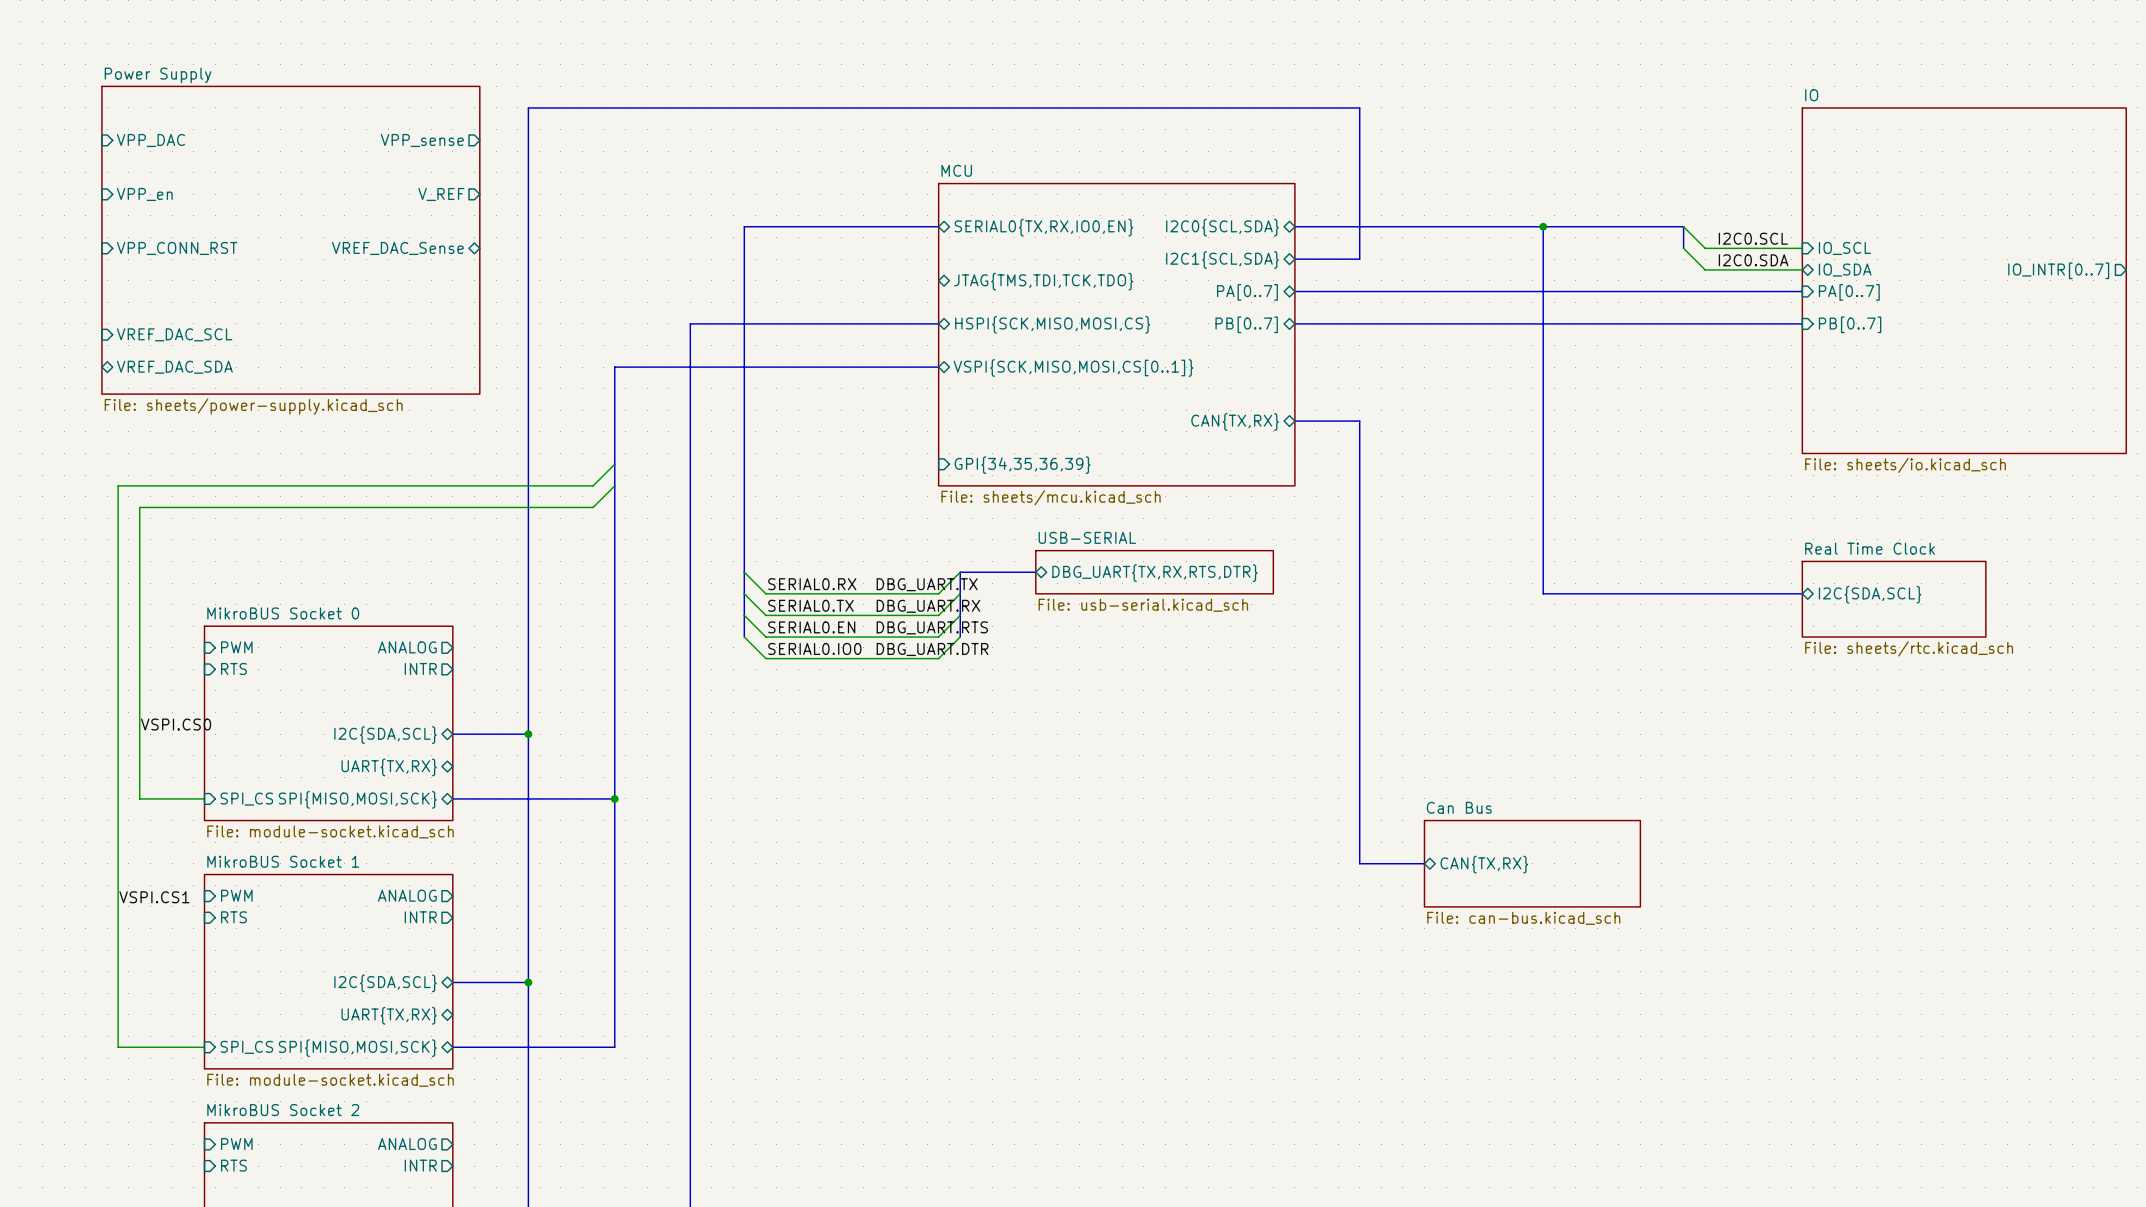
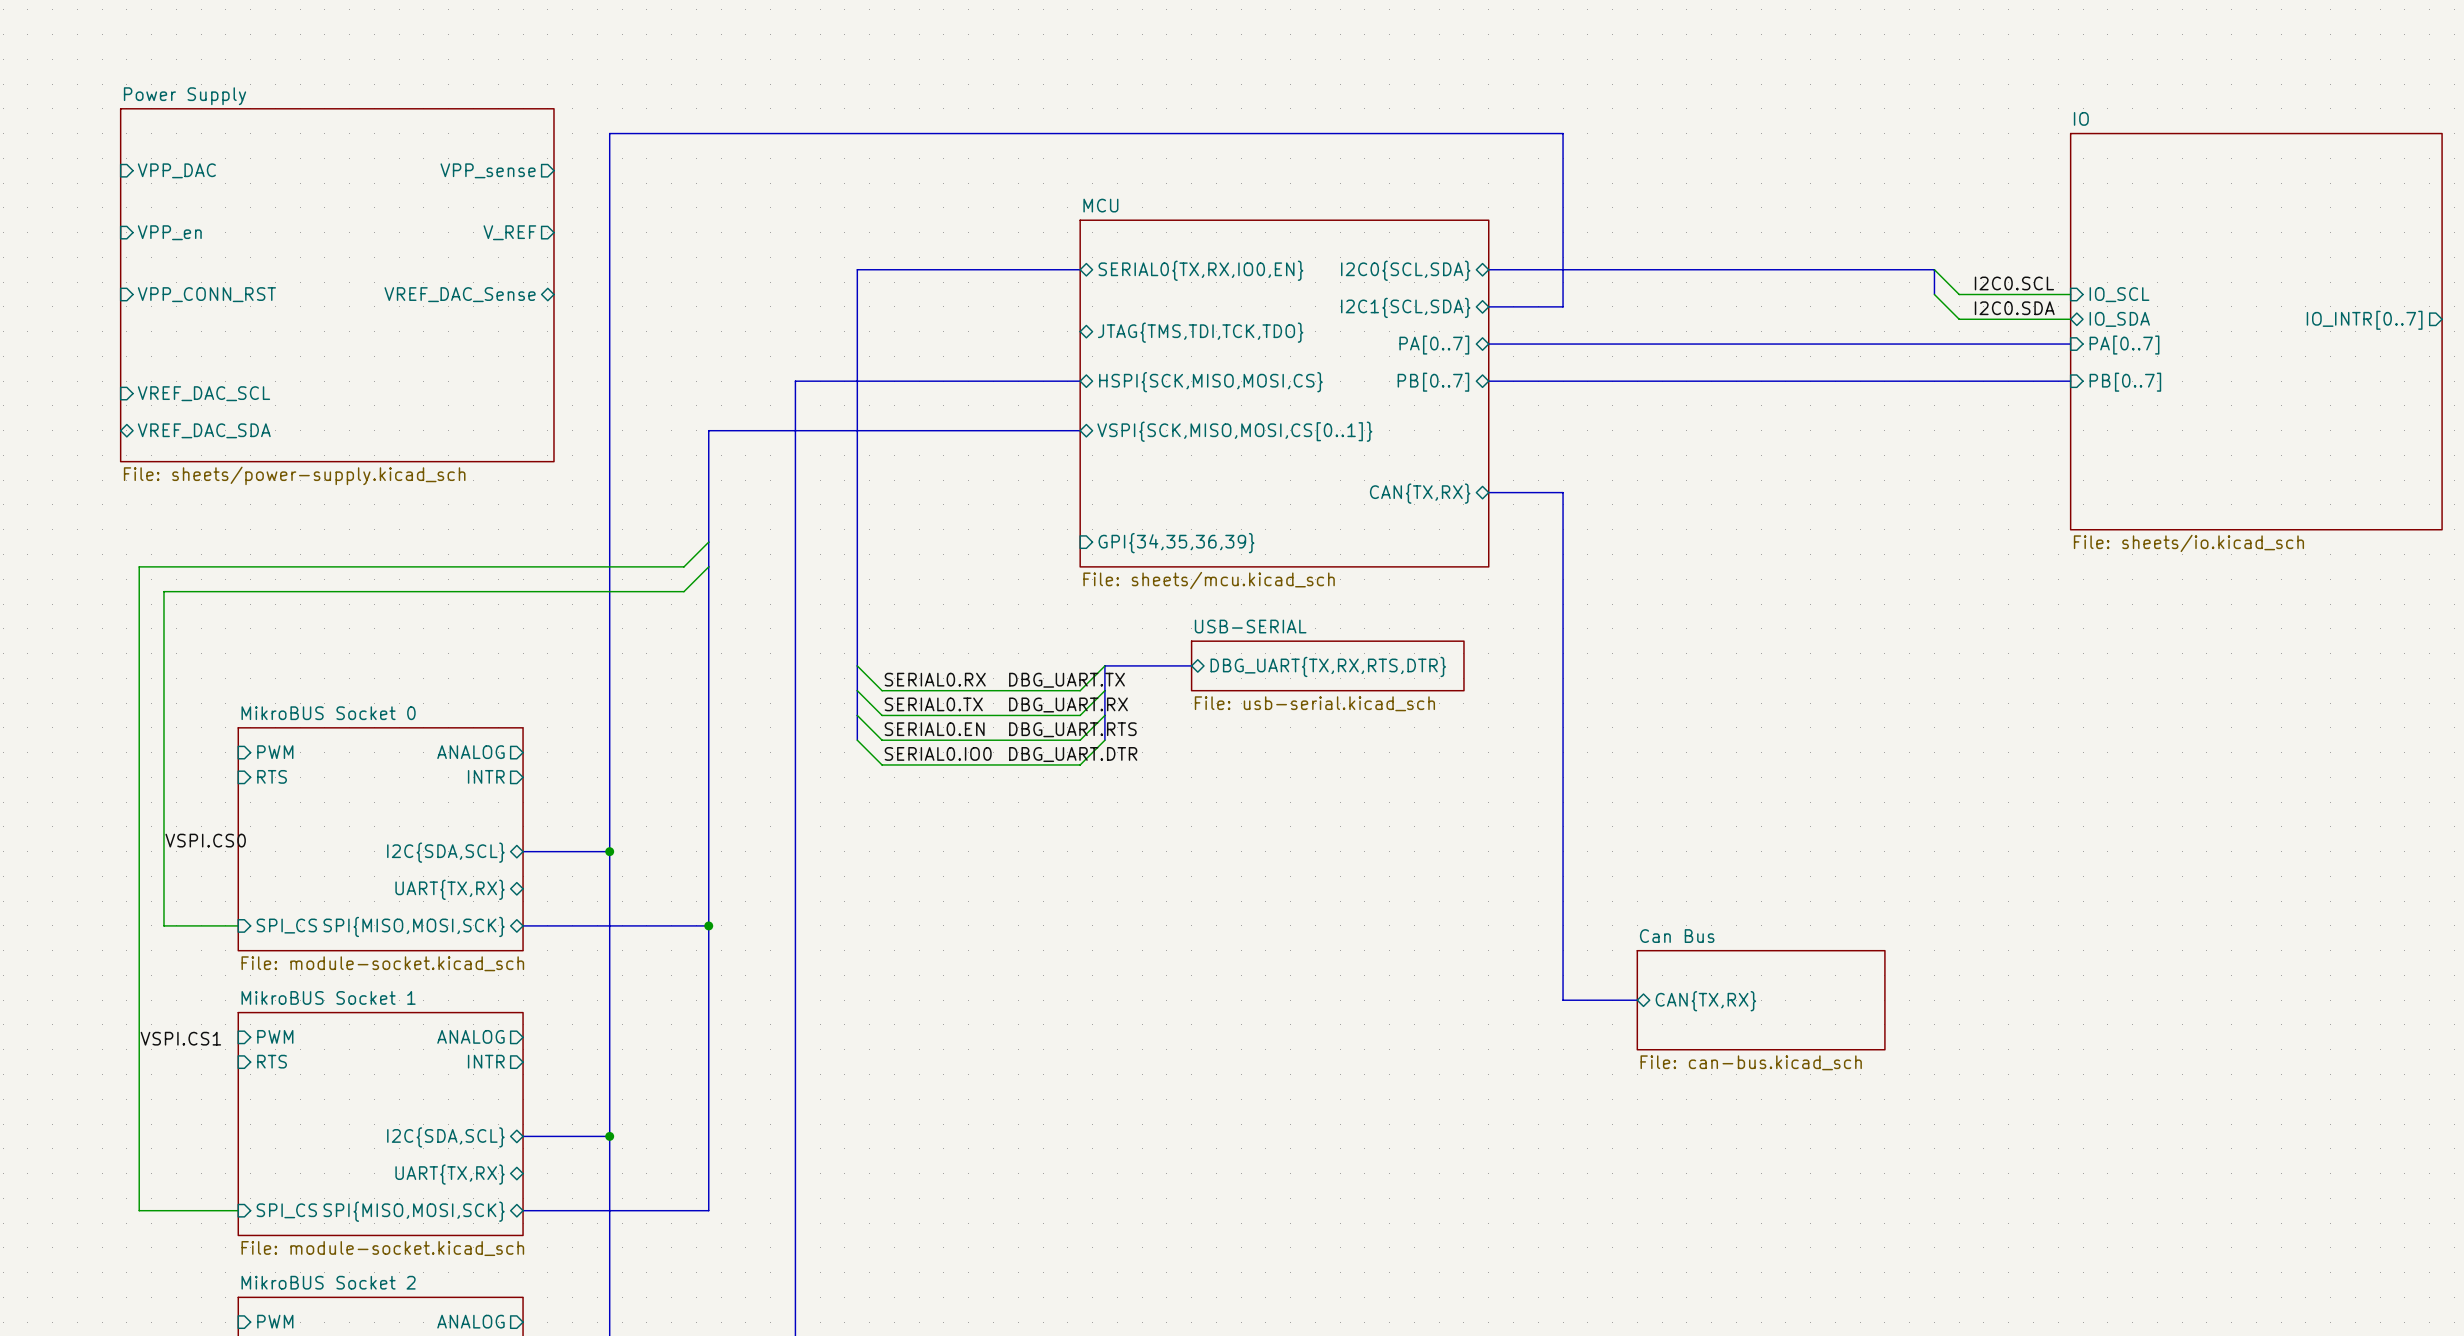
bus: (1543, 226) (1543, 593) (1802, 593) -> none
junction: (1543, 226) -> none
sheet pin: I2C{SDA,SCL} (1870, 594) -> none
sheet Real Time Clock: File: sheets/rtc.kicad_sch (1894, 599) -> none

